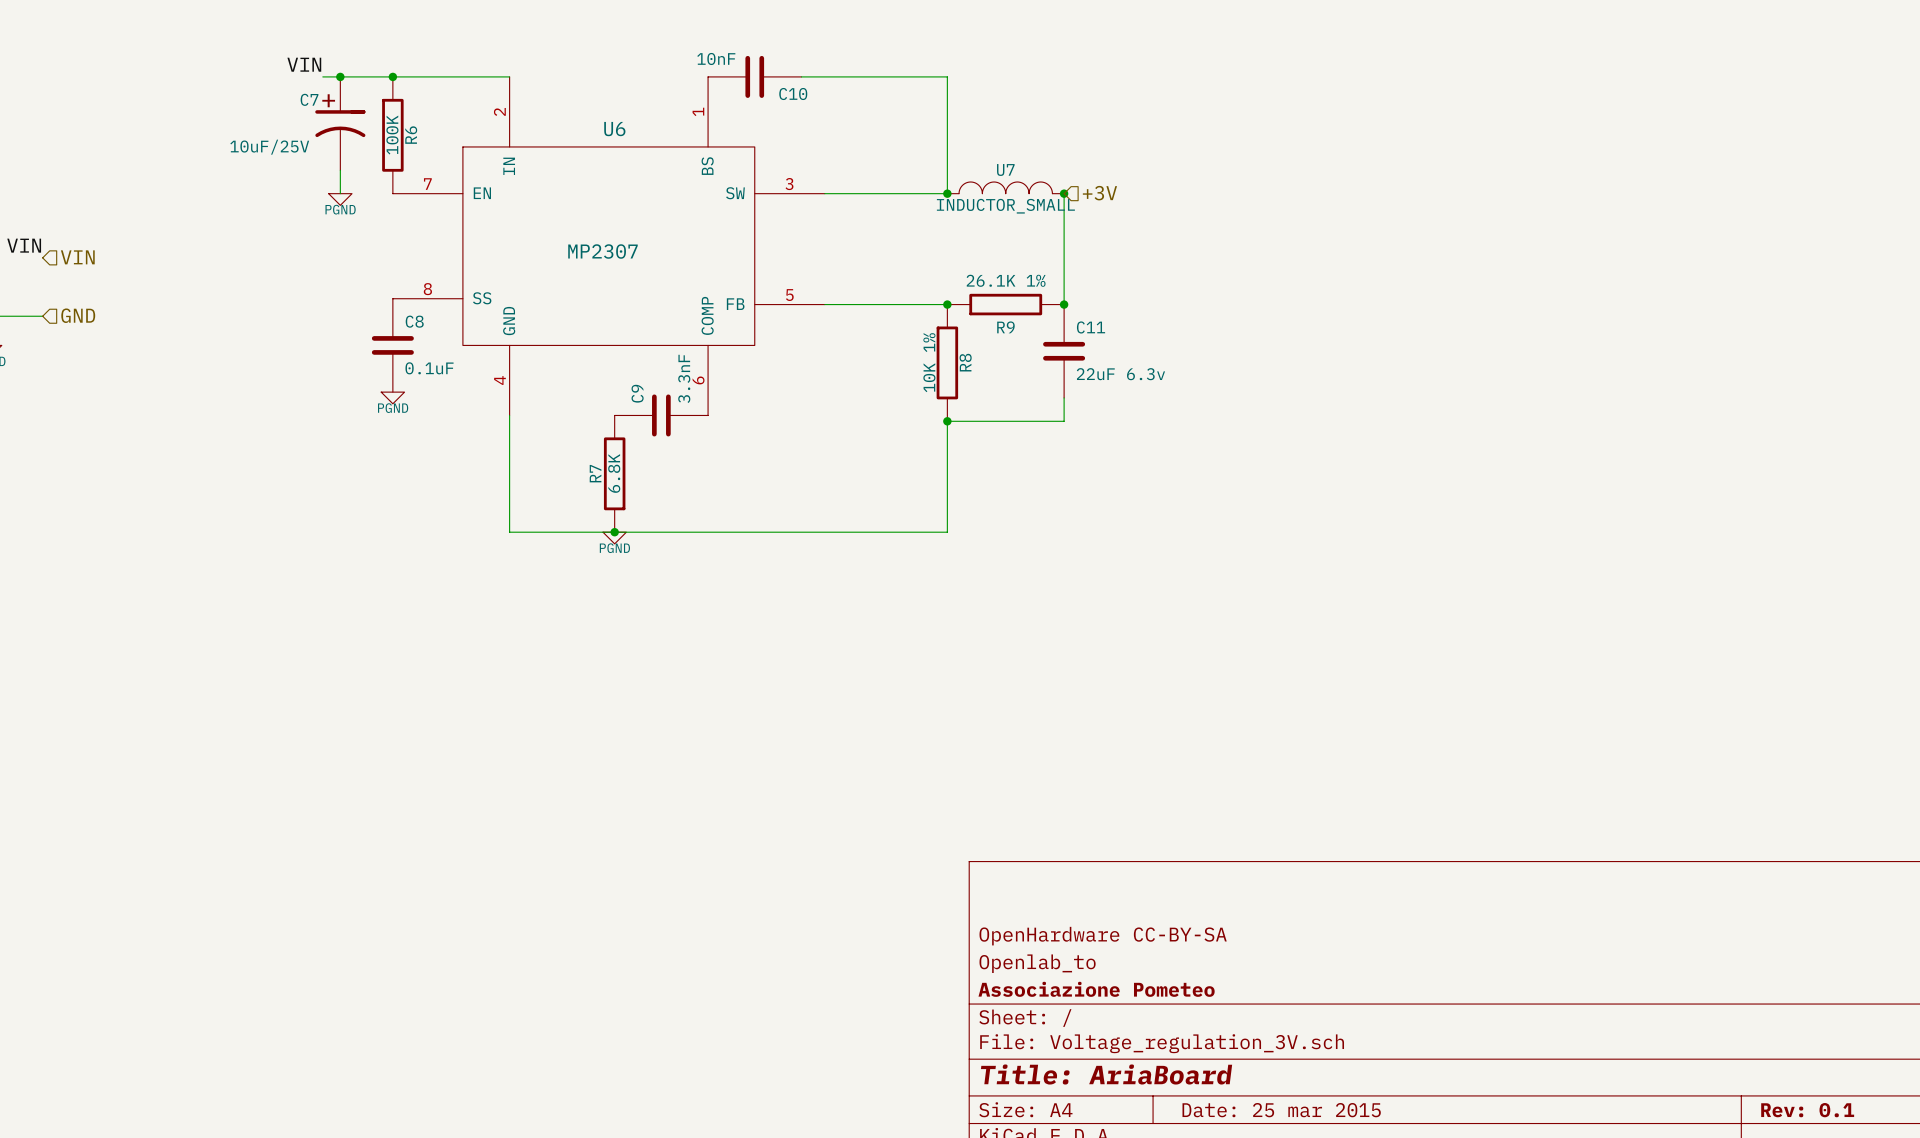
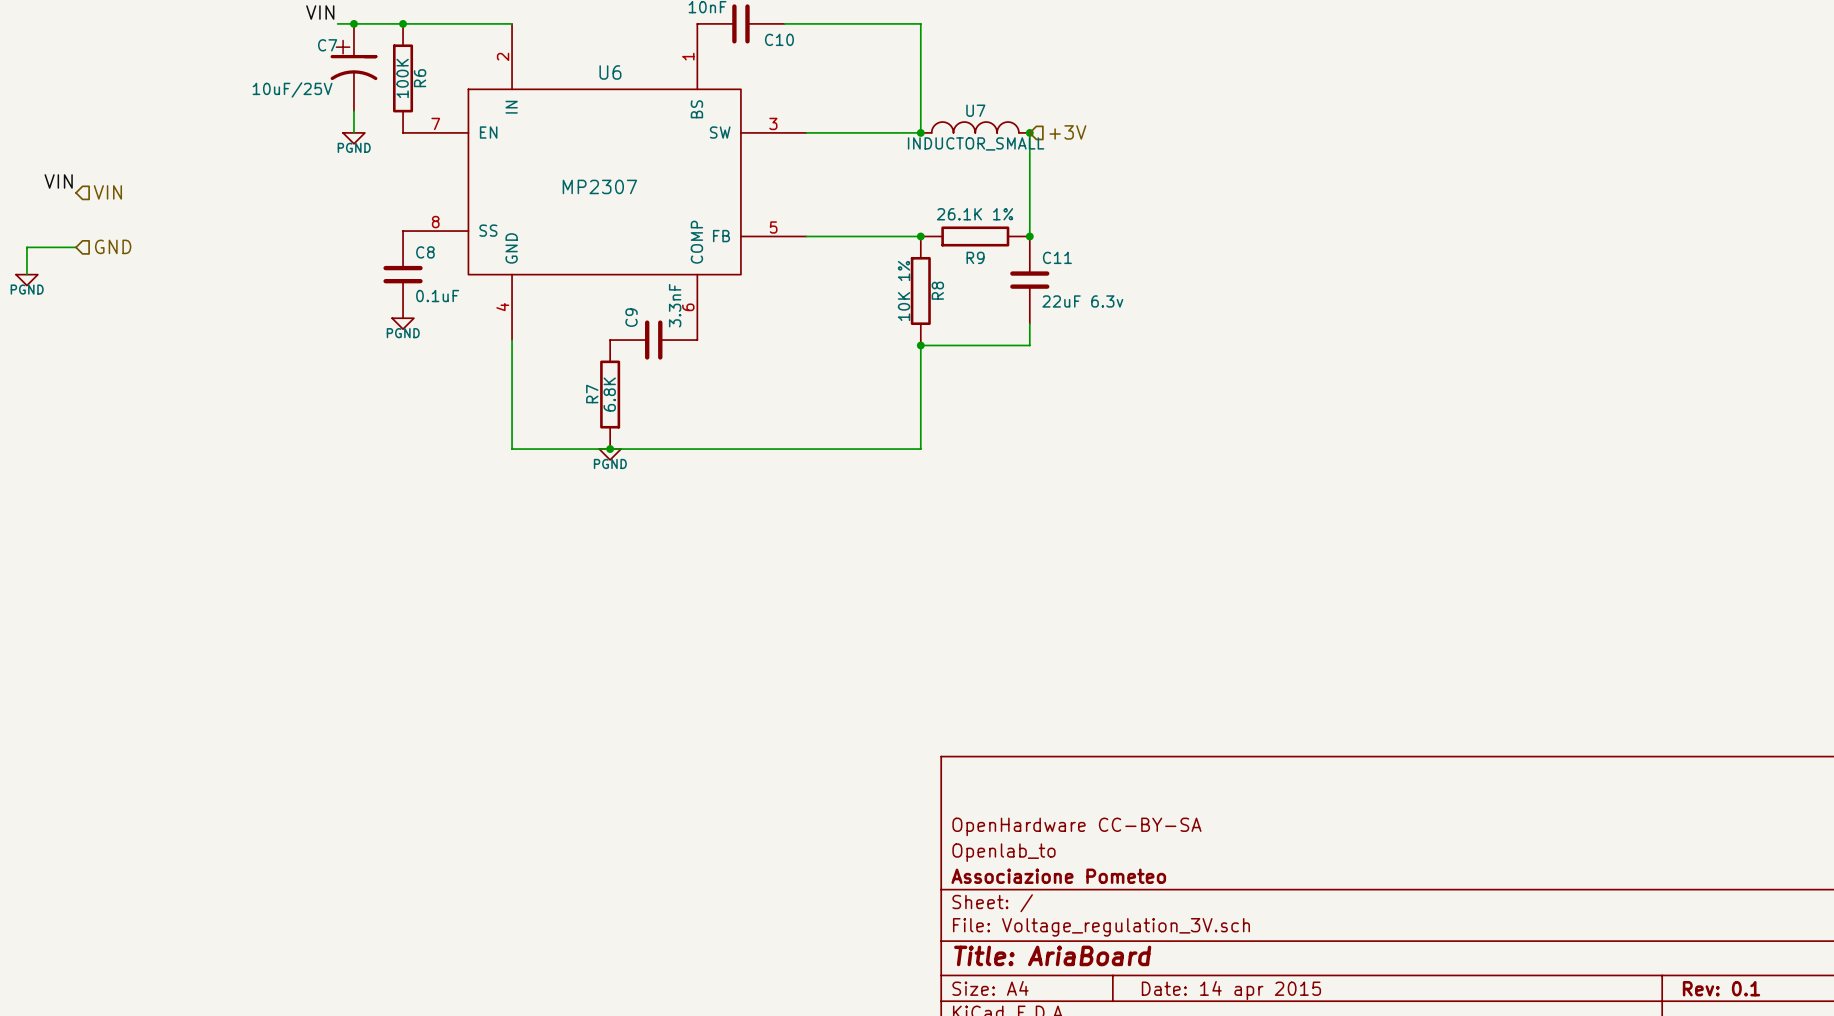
title block: Date: 25 mar 2015 (1281, 1110) -> Date: 14 apr 2015 (1231, 990)

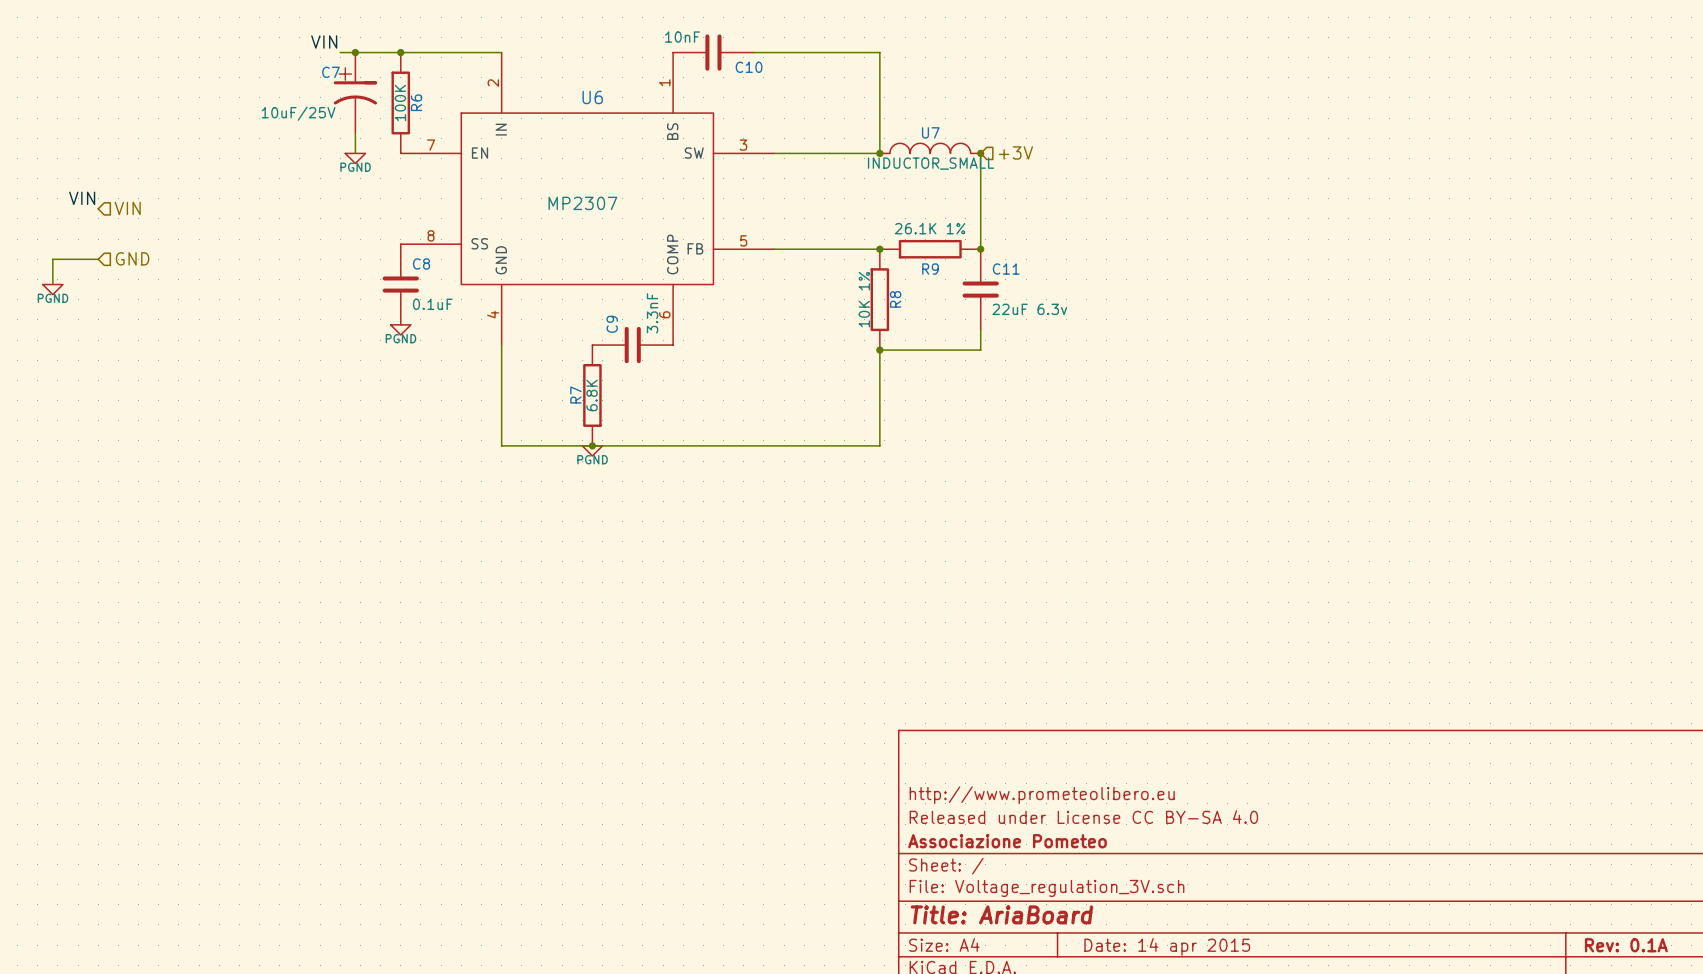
title block: OpenHardware CC-BY-SA (1076, 826) -> http://www.prometeolibero.eu (1042, 795)
title block: Openlab_to (1003, 852) -> Released under License CC BY-SA 4.0 (1083, 817)
title block: Rev: 0.1 (1721, 988) -> Rev: 0.1A (1626, 945)

